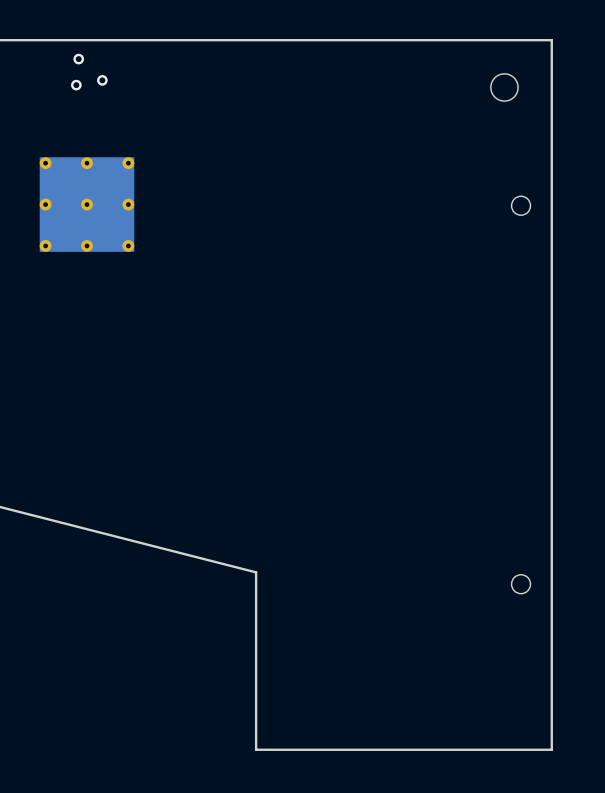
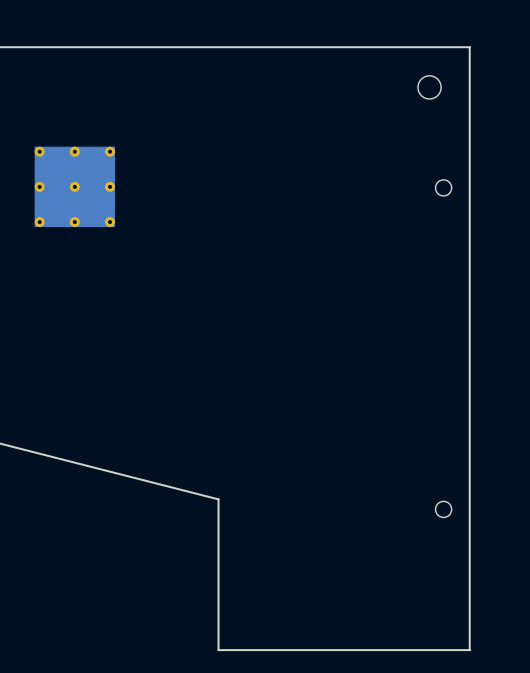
via: (78, 59) -> none
via: (102, 80) -> none
via: (76, 85) -> none

